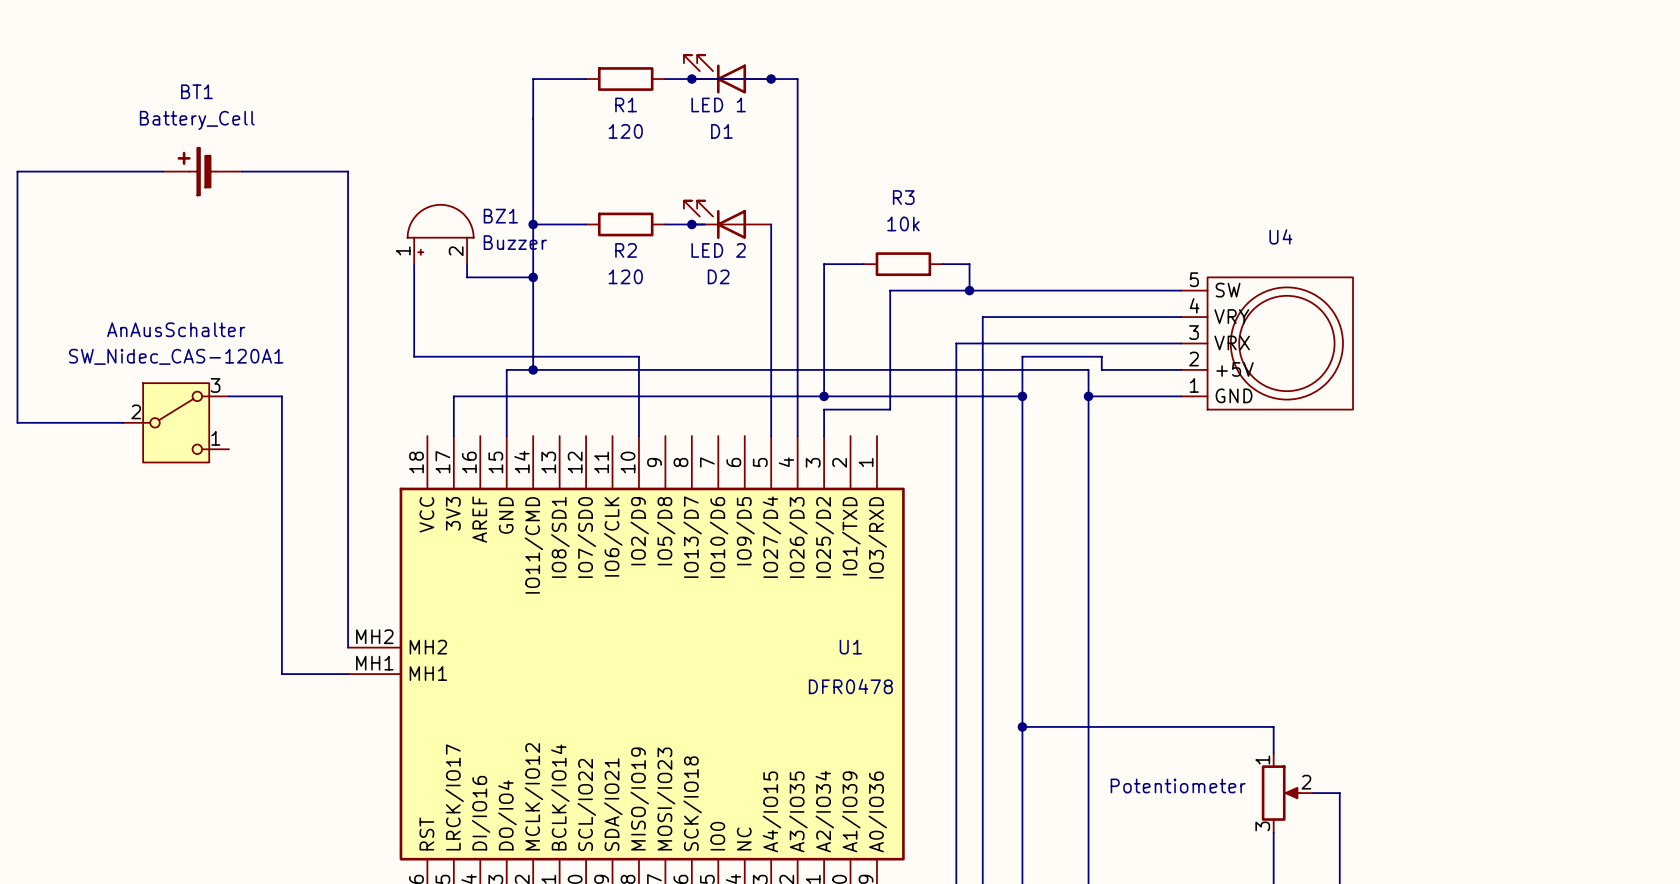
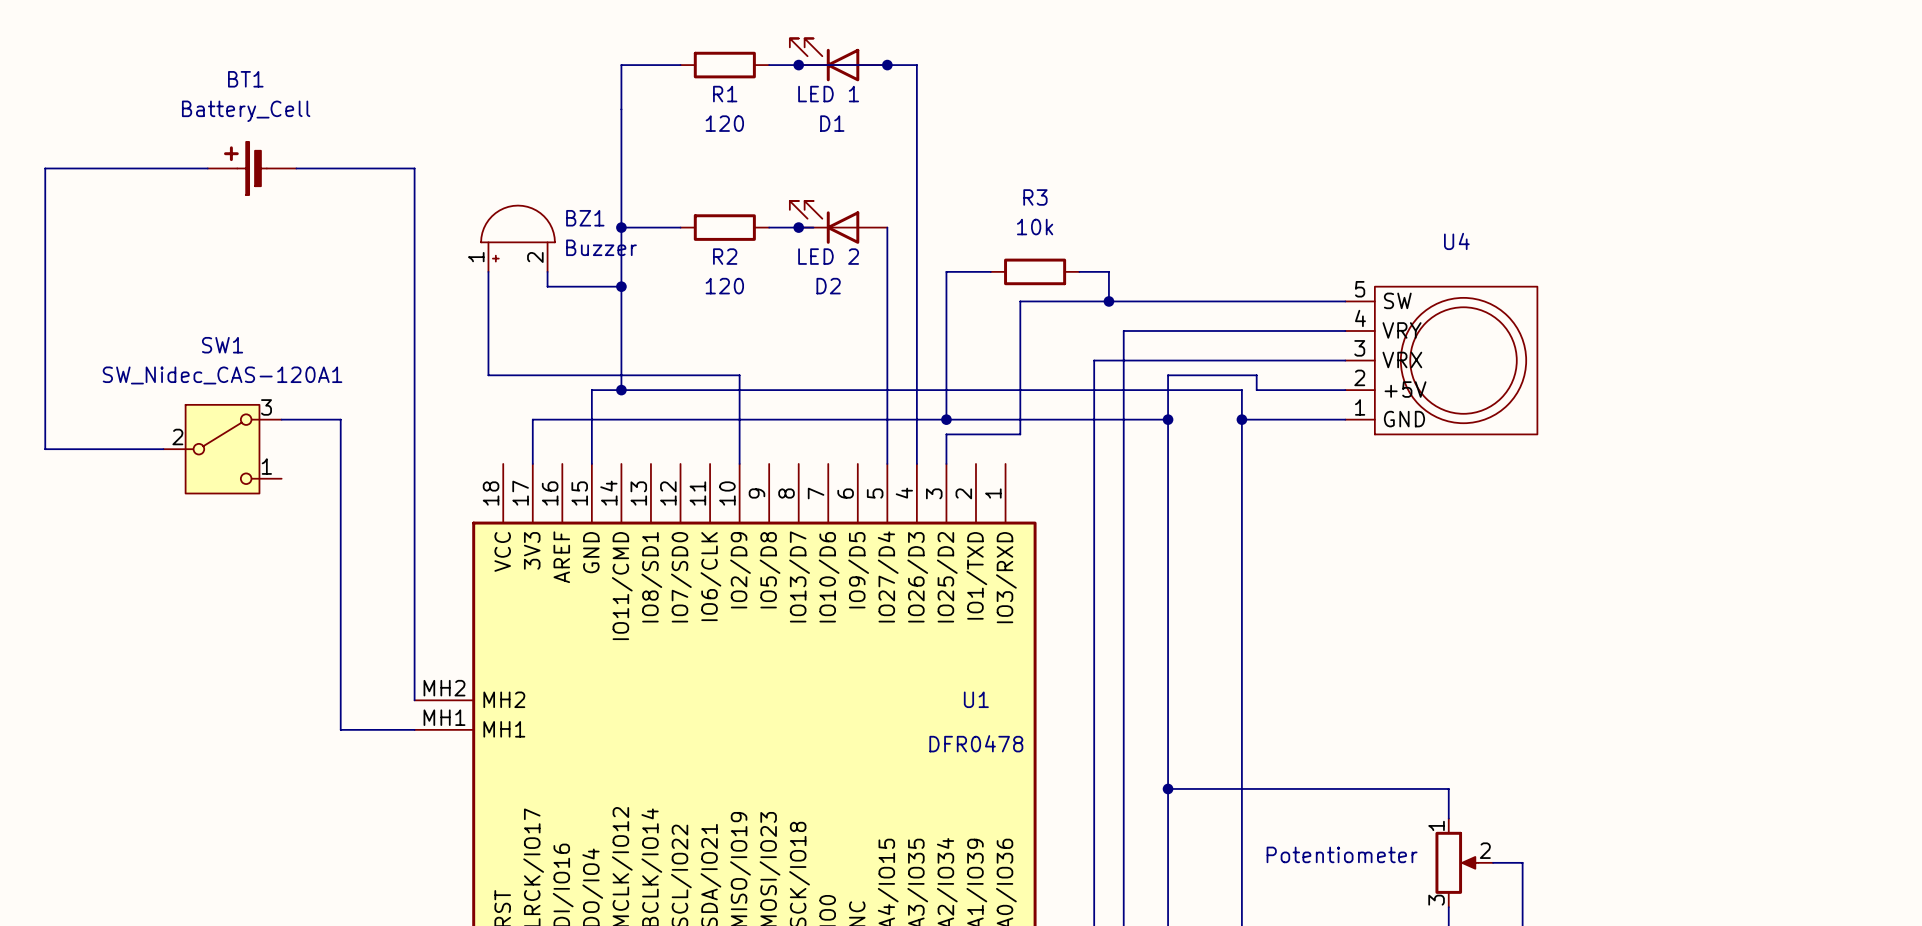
AnAusSchalter name: AnAusSchalter (176, 329) -> SW1 (222, 345)

